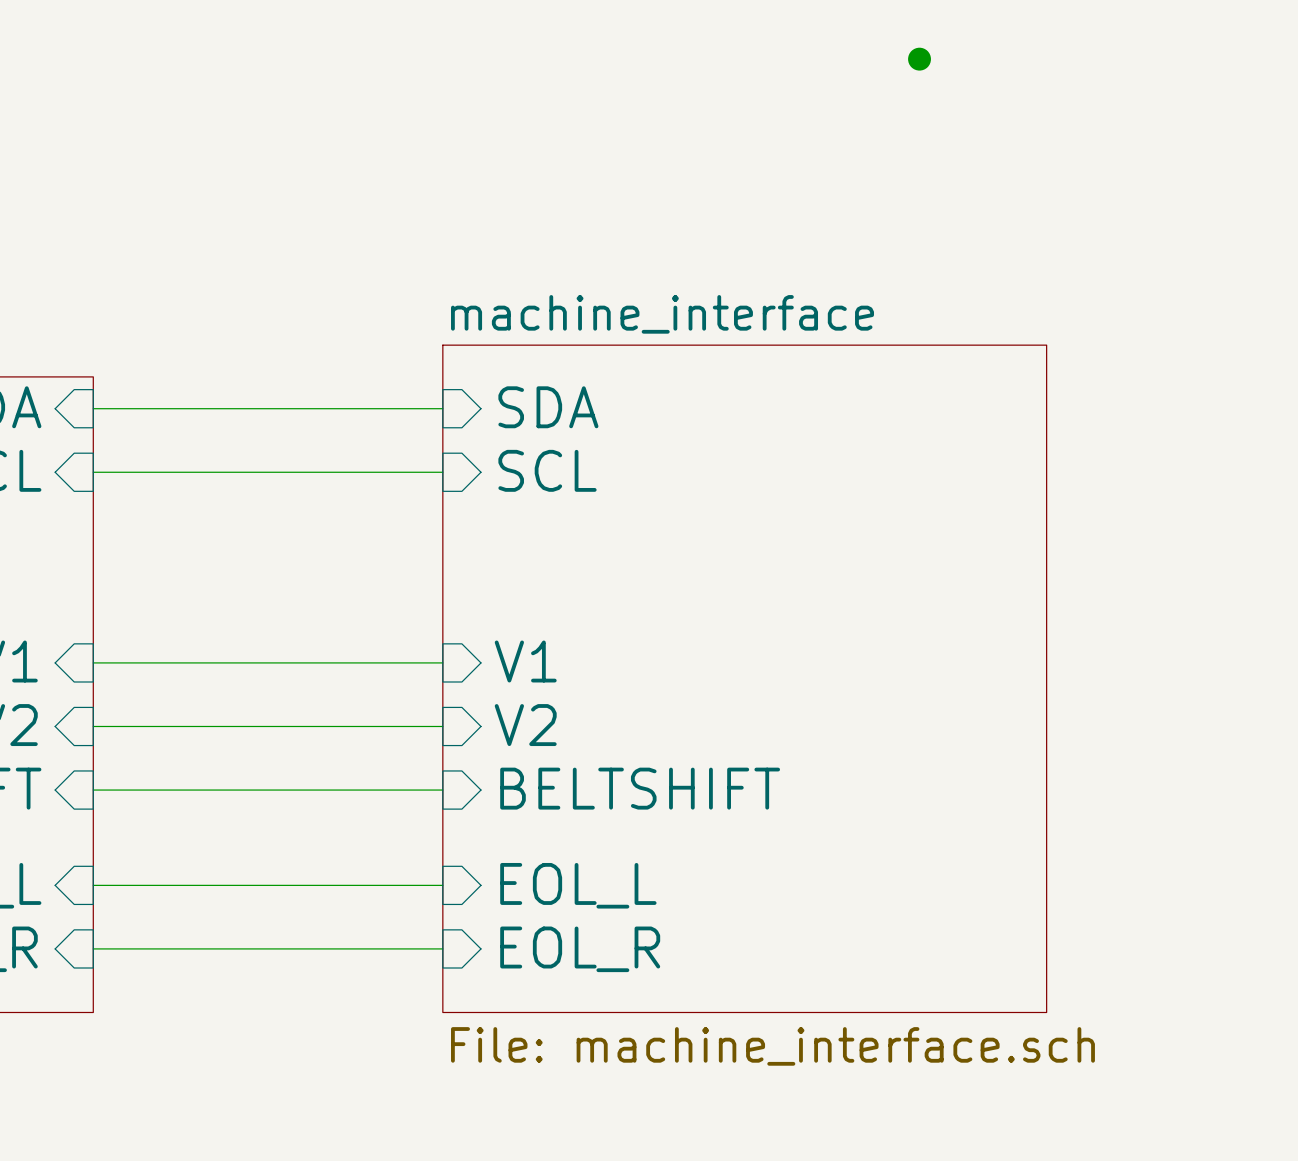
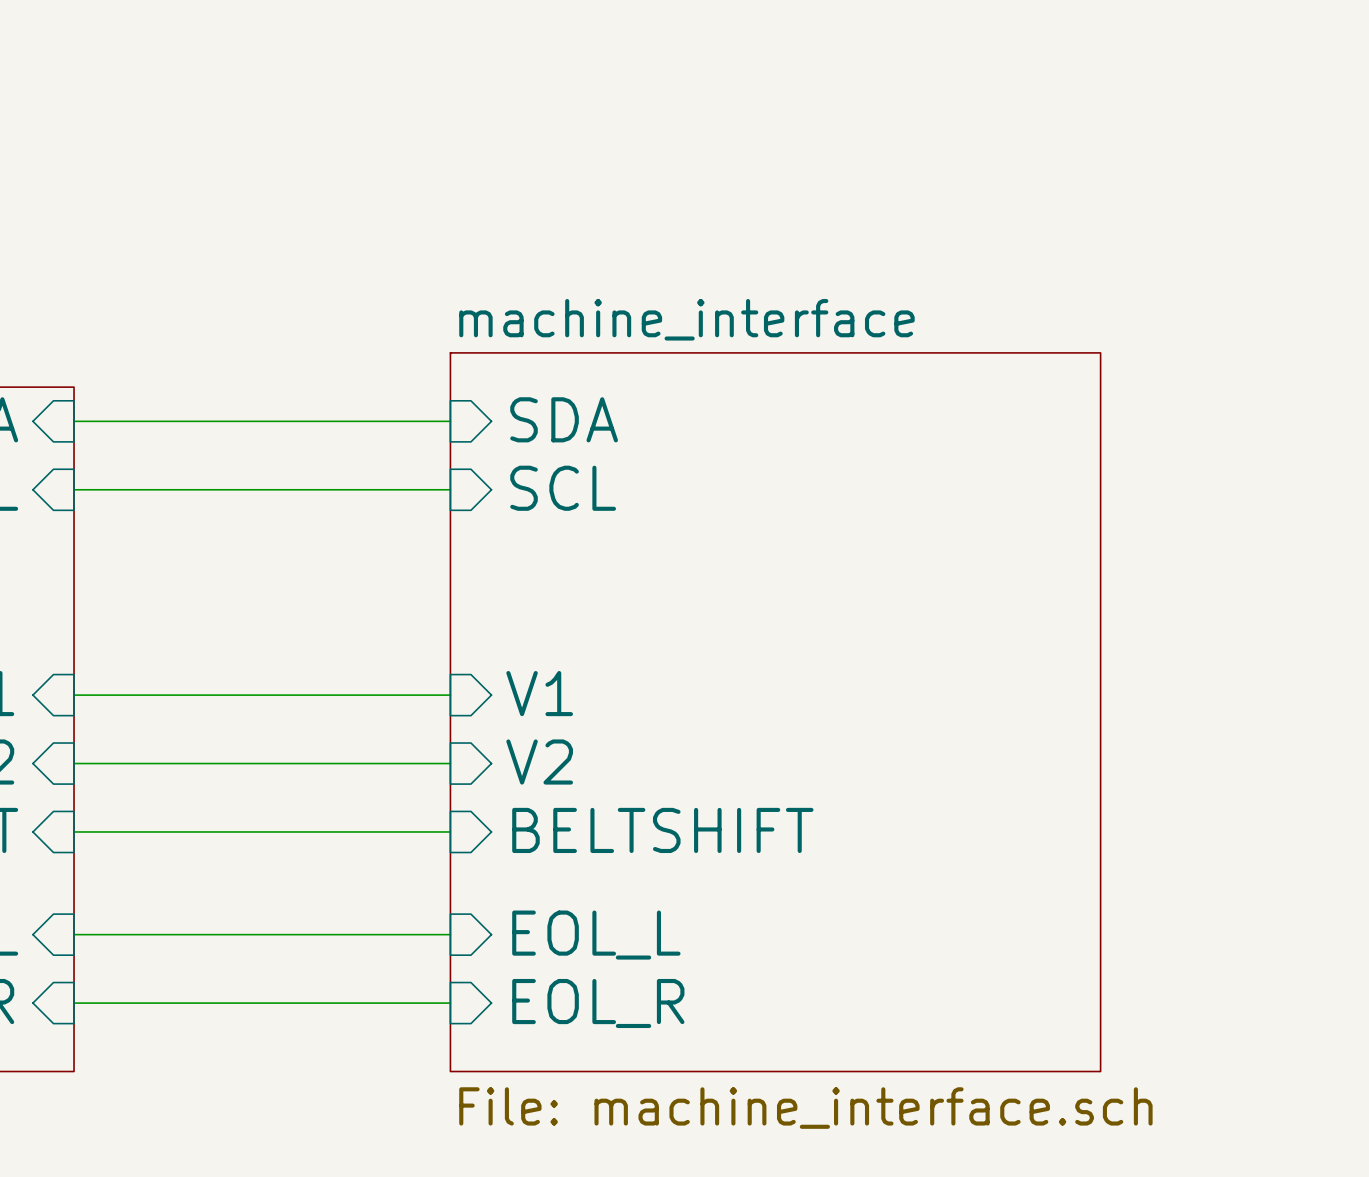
junction: (919, 59) -> none

